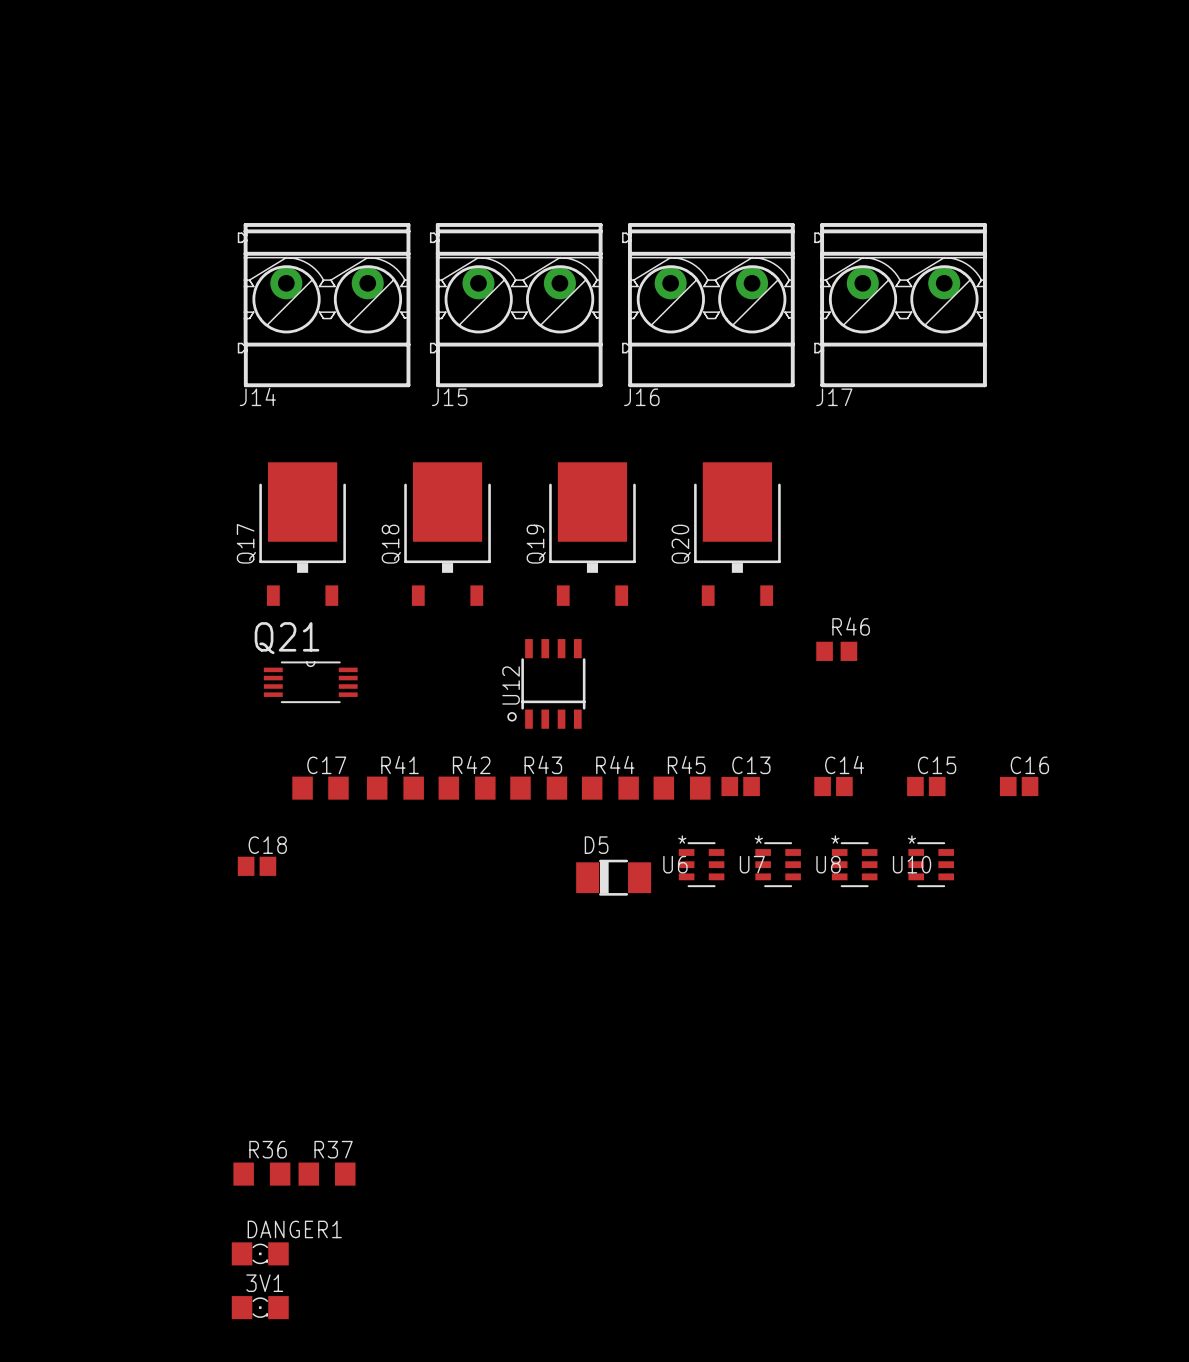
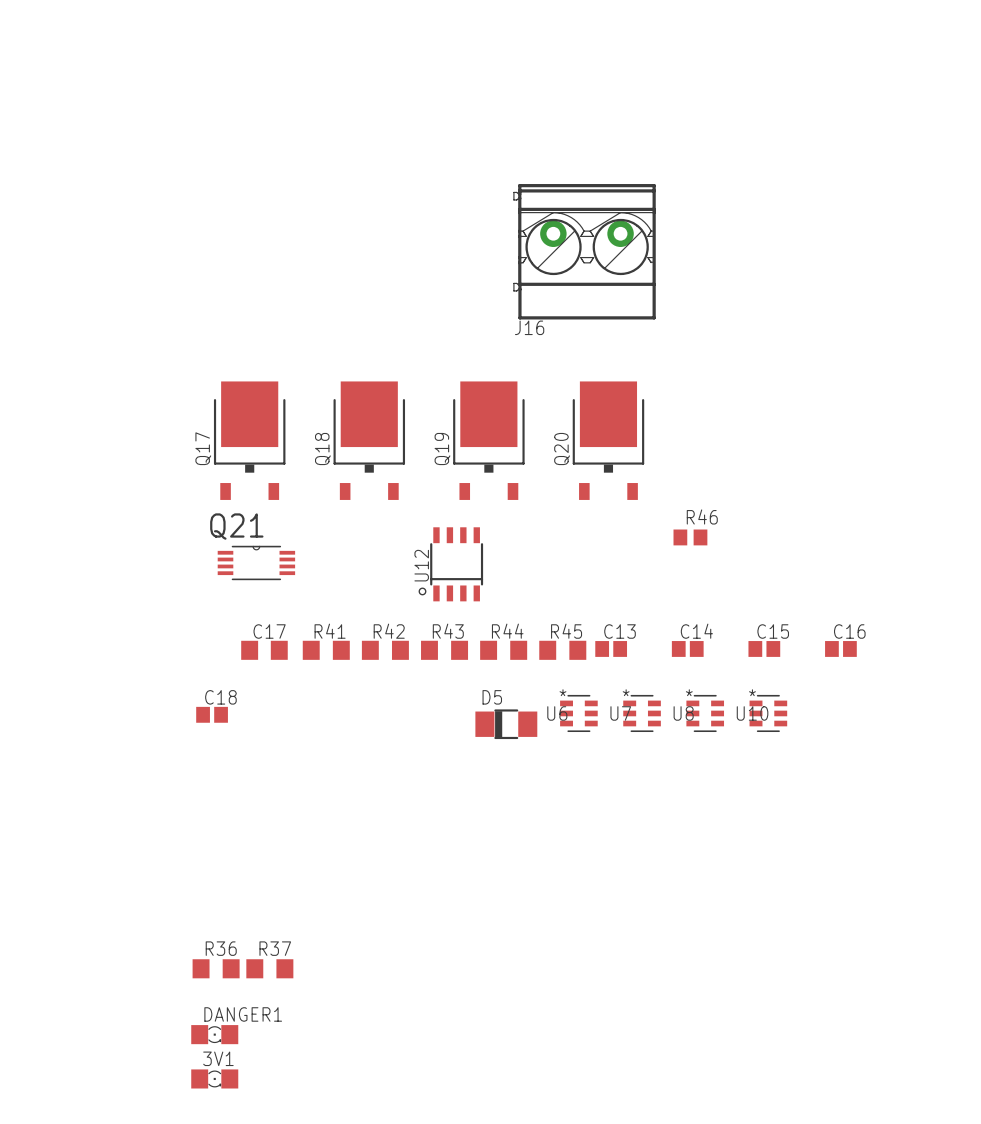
J14: (324, 305) -> none
J15: (516, 305) -> none
J17: (900, 305) -> none

